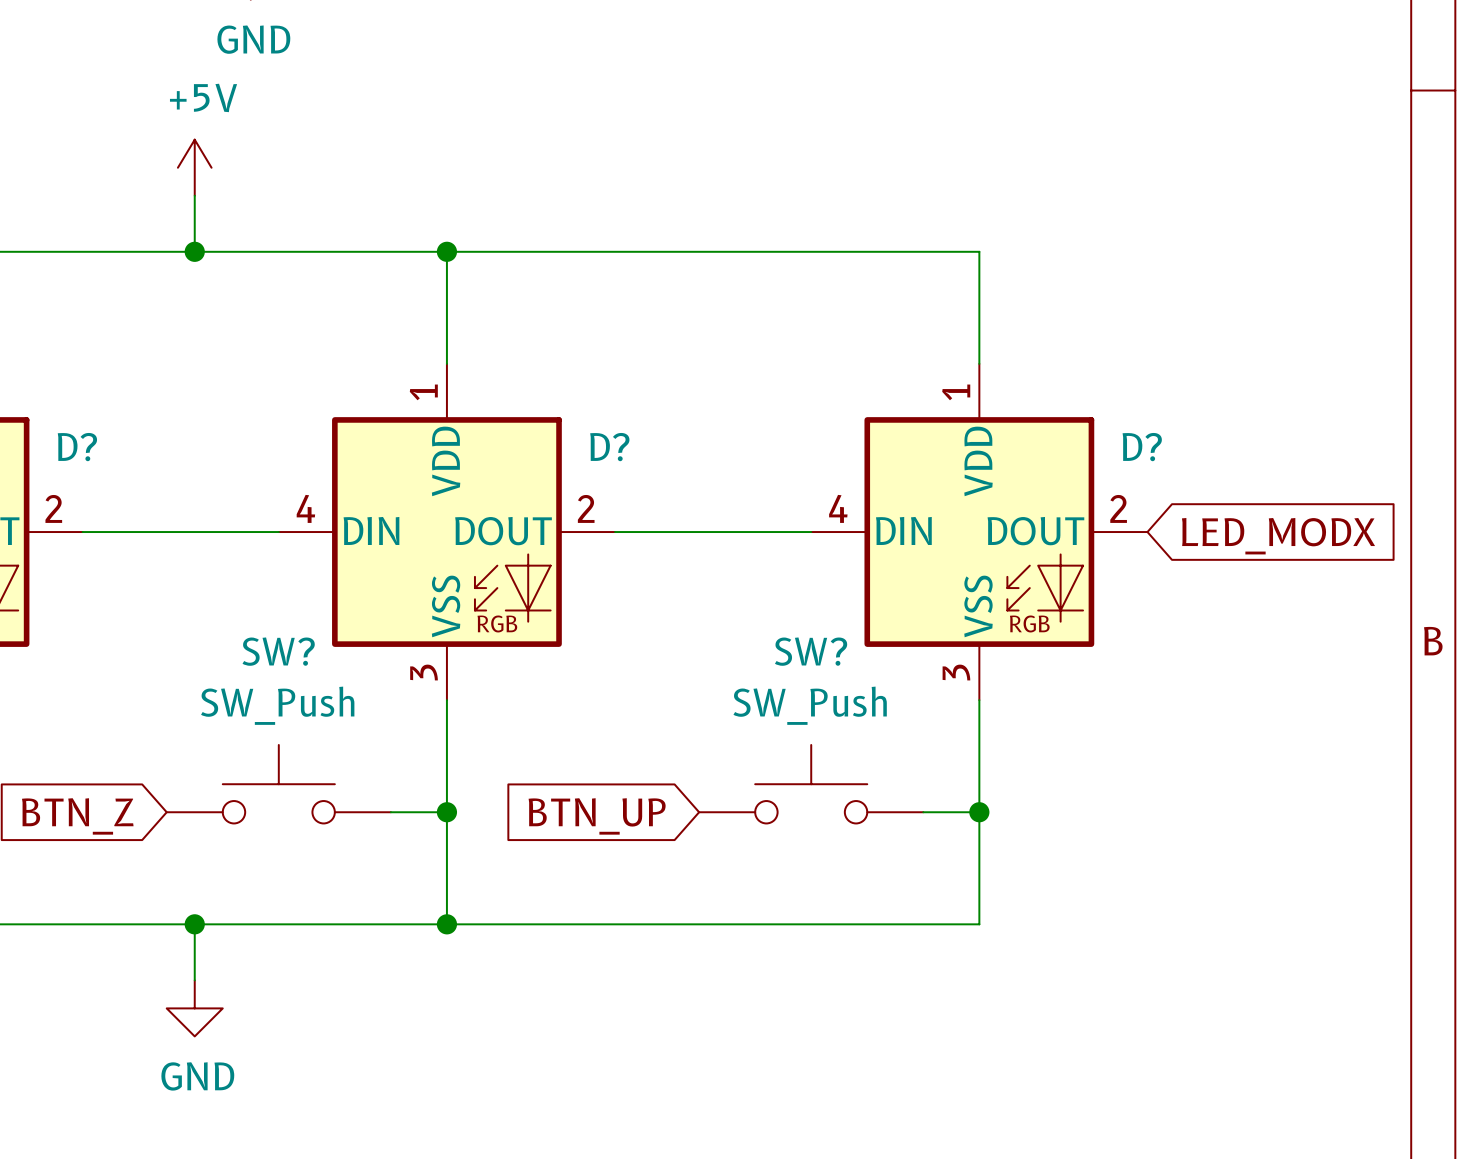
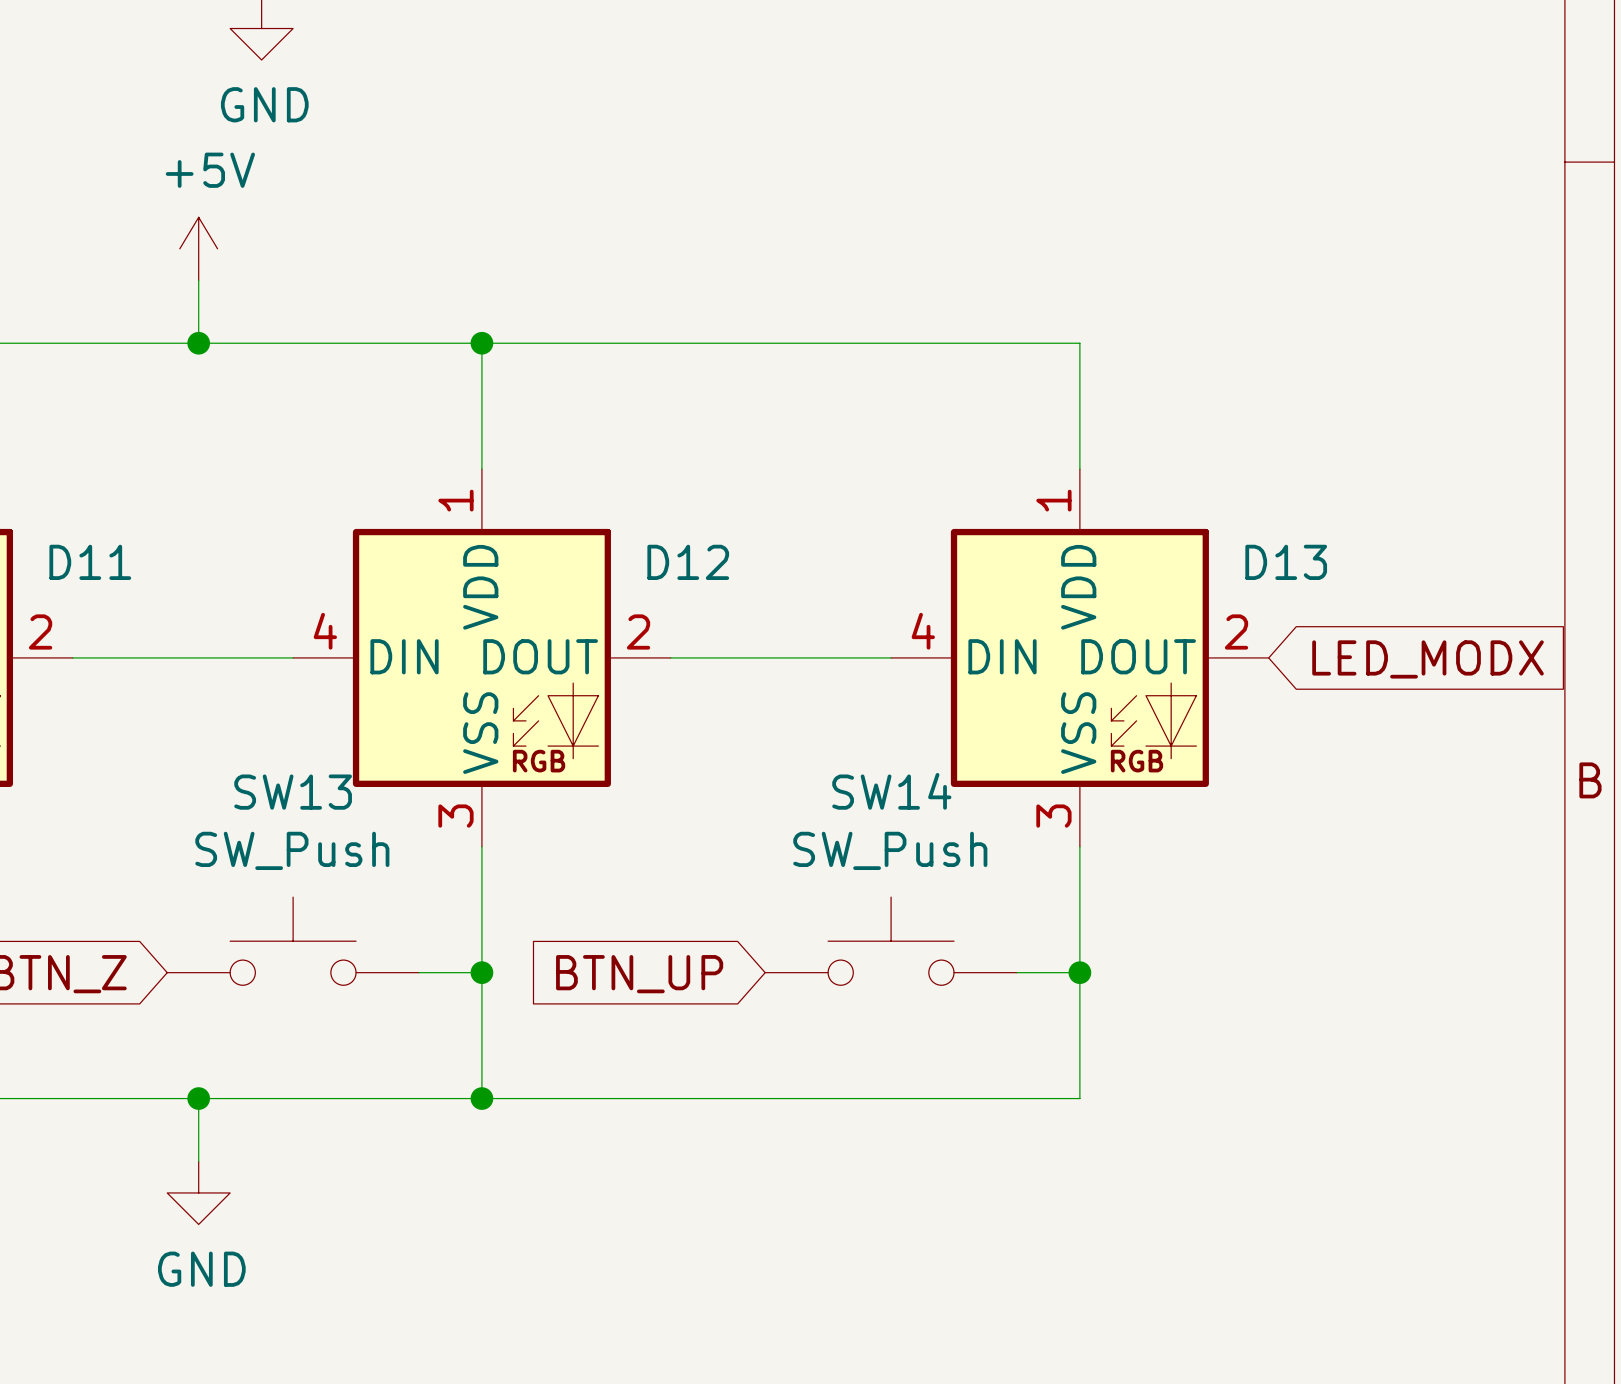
D? name: D? (77, 447) -> D11 (90, 562)
D? name: D? (609, 447) -> D12 (688, 562)
D? name: D? (1142, 447) -> D13 (1286, 562)
SW? name: SW? (278, 651) -> SW13 (293, 792)
SW? name: SW? (811, 651) -> SW14 (891, 791)

